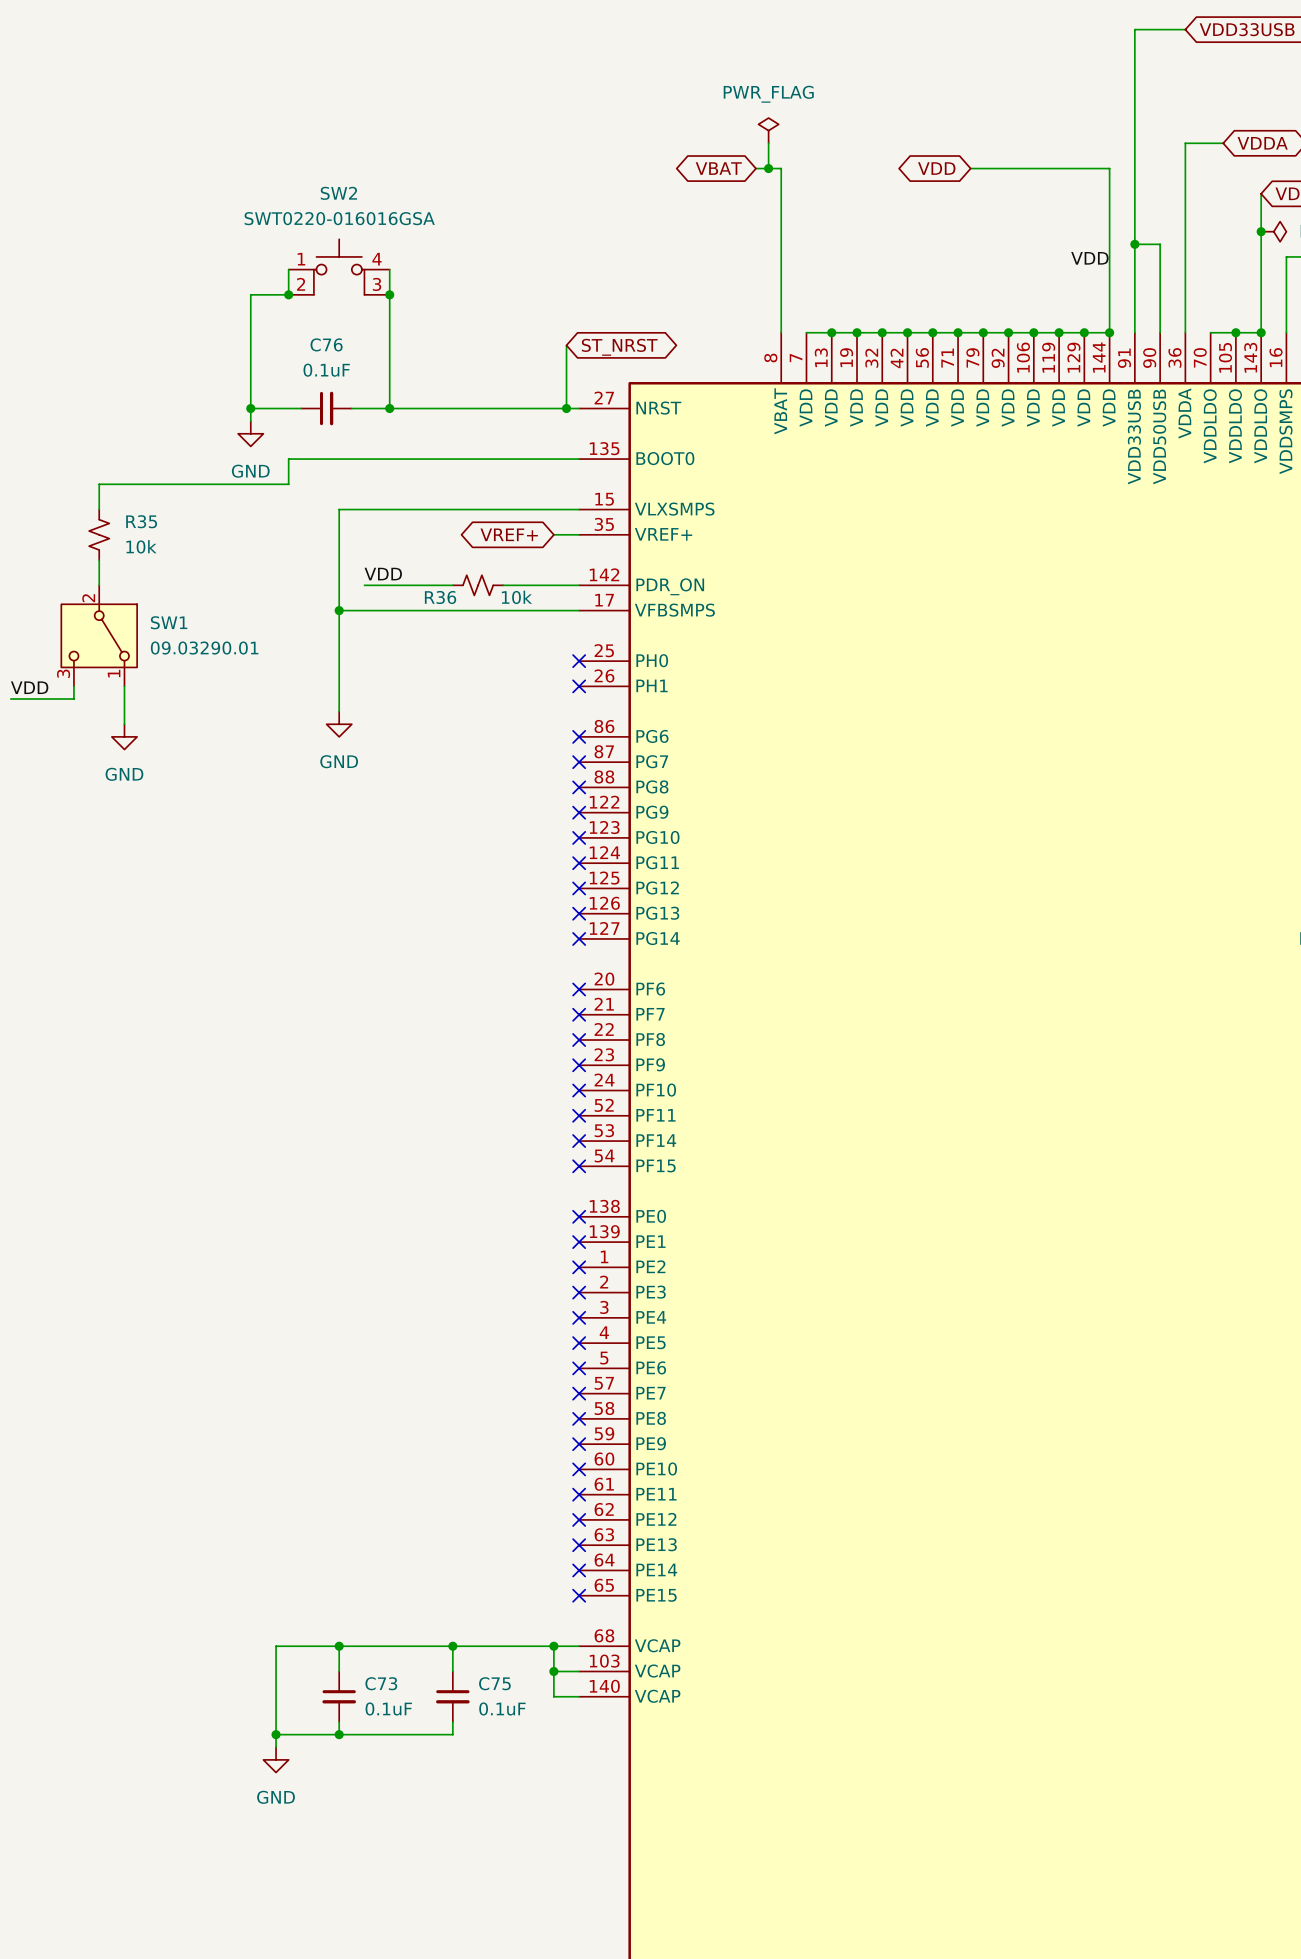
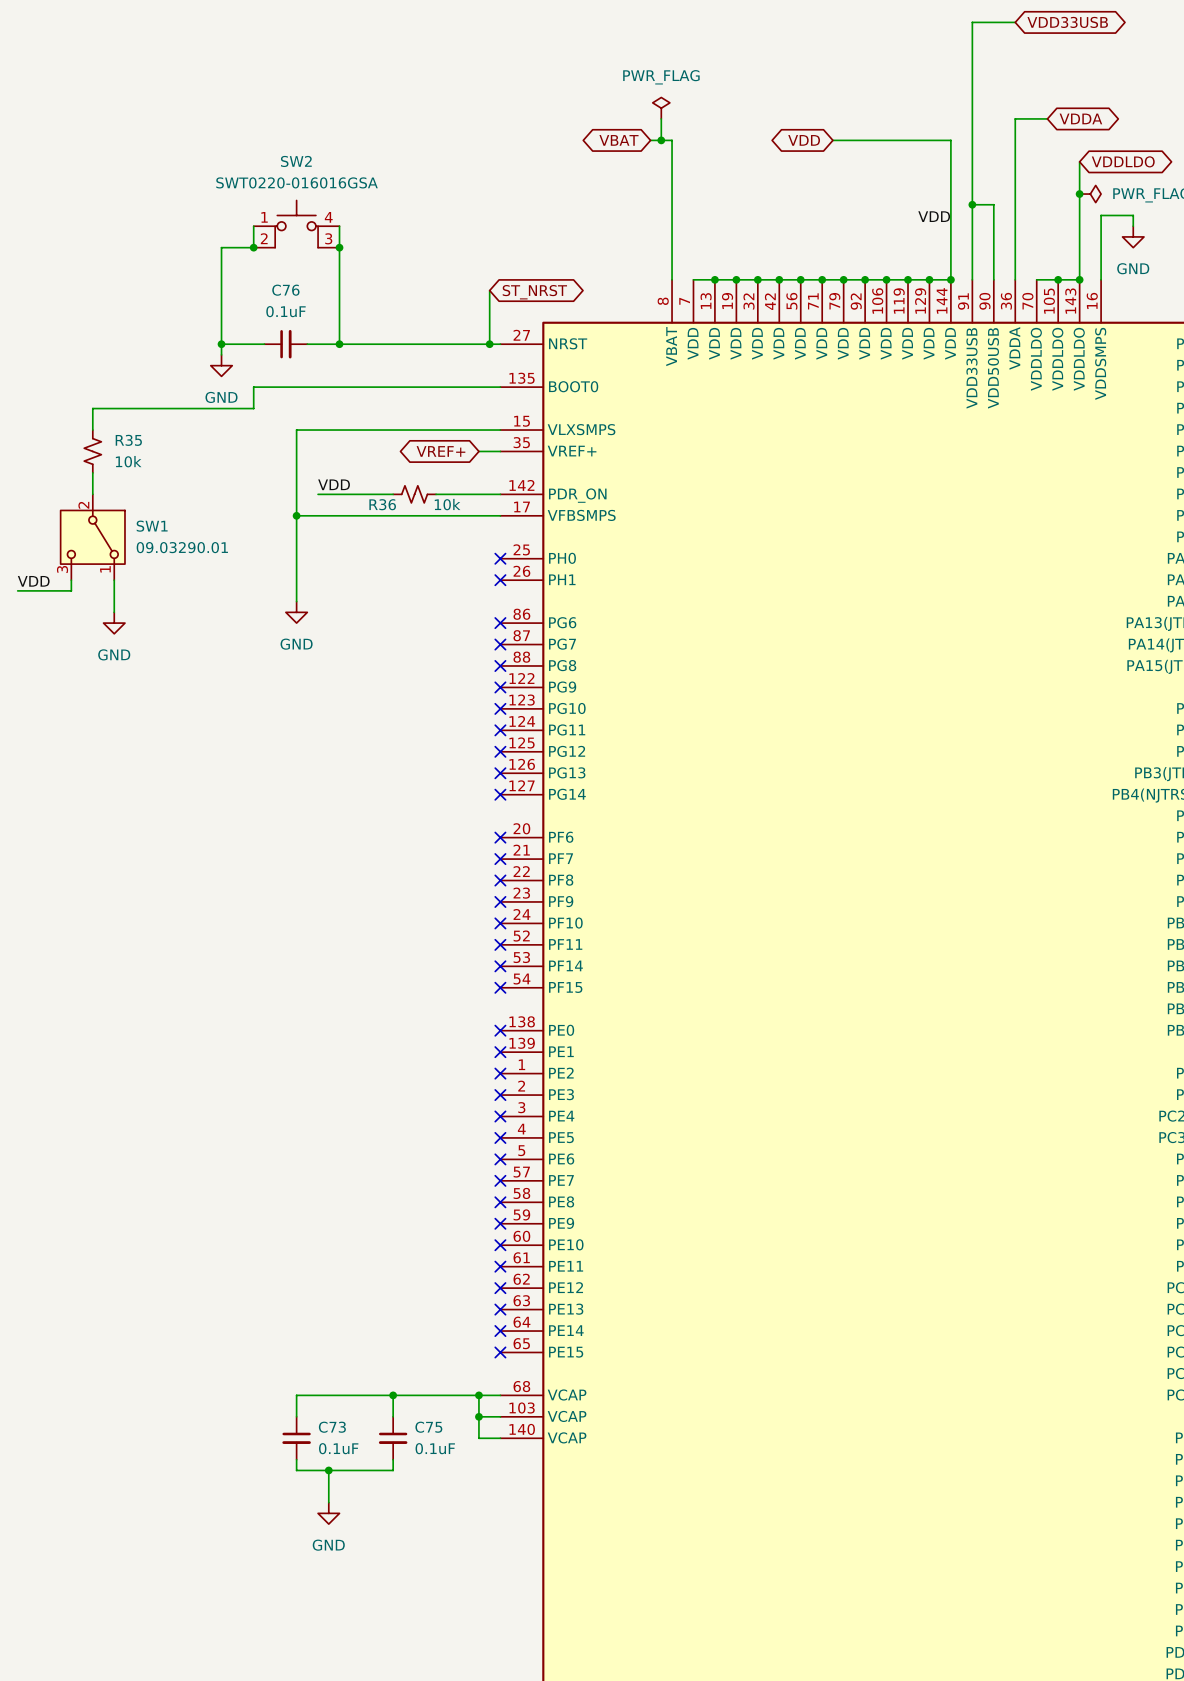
wire: (339, 1646) (276, 1646) (276, 1747) -> none
junction: (339, 1646) -> none
wire: (276, 1734) (339, 1734) -> none
junction: (276, 1734) -> none
junction position: (339, 1734) -> (328, 1470)
wire: none -> (328, 1470) (328, 1502)
power symbol position: GND (276, 1759) -> GND (328, 1513)

